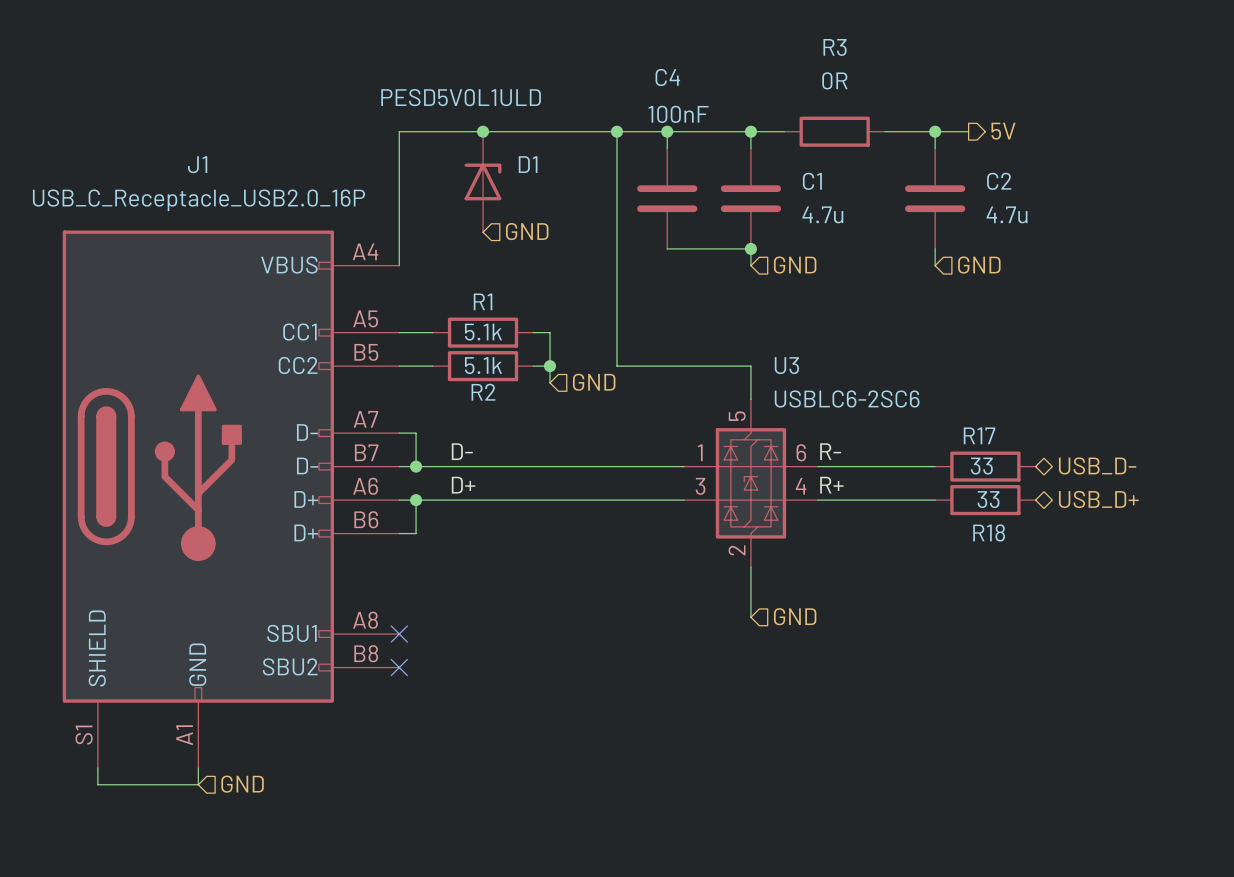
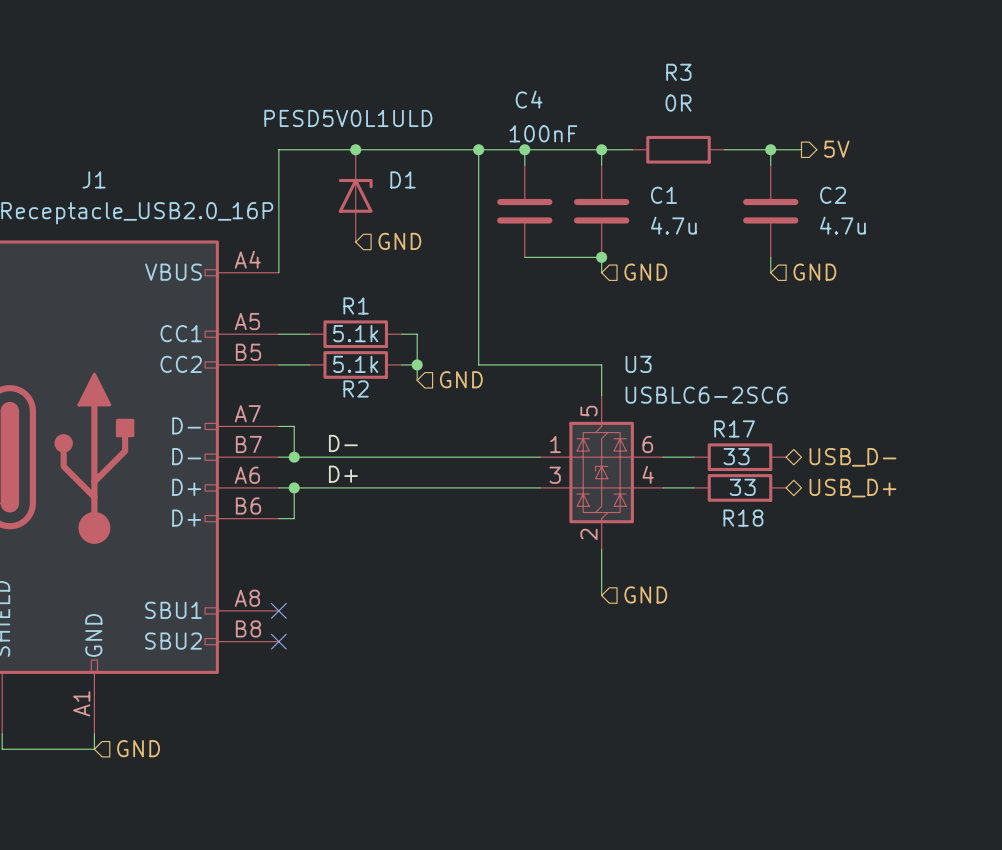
label: R- (830, 451) -> none
hierarchical label position: USB_D- (1097, 465) -> USB_D- (852, 457)
wire: (851, 466) (935, 466) -> none
R17 position: (985, 466) -> (739, 457)
label: R+ (831, 485) -> none
hierarchical label position: USB_D+ (1098, 499) -> USB_D+ (852, 488)
wire: (851, 500) (935, 500) -> none
R18 position: (985, 500) -> (739, 487)

